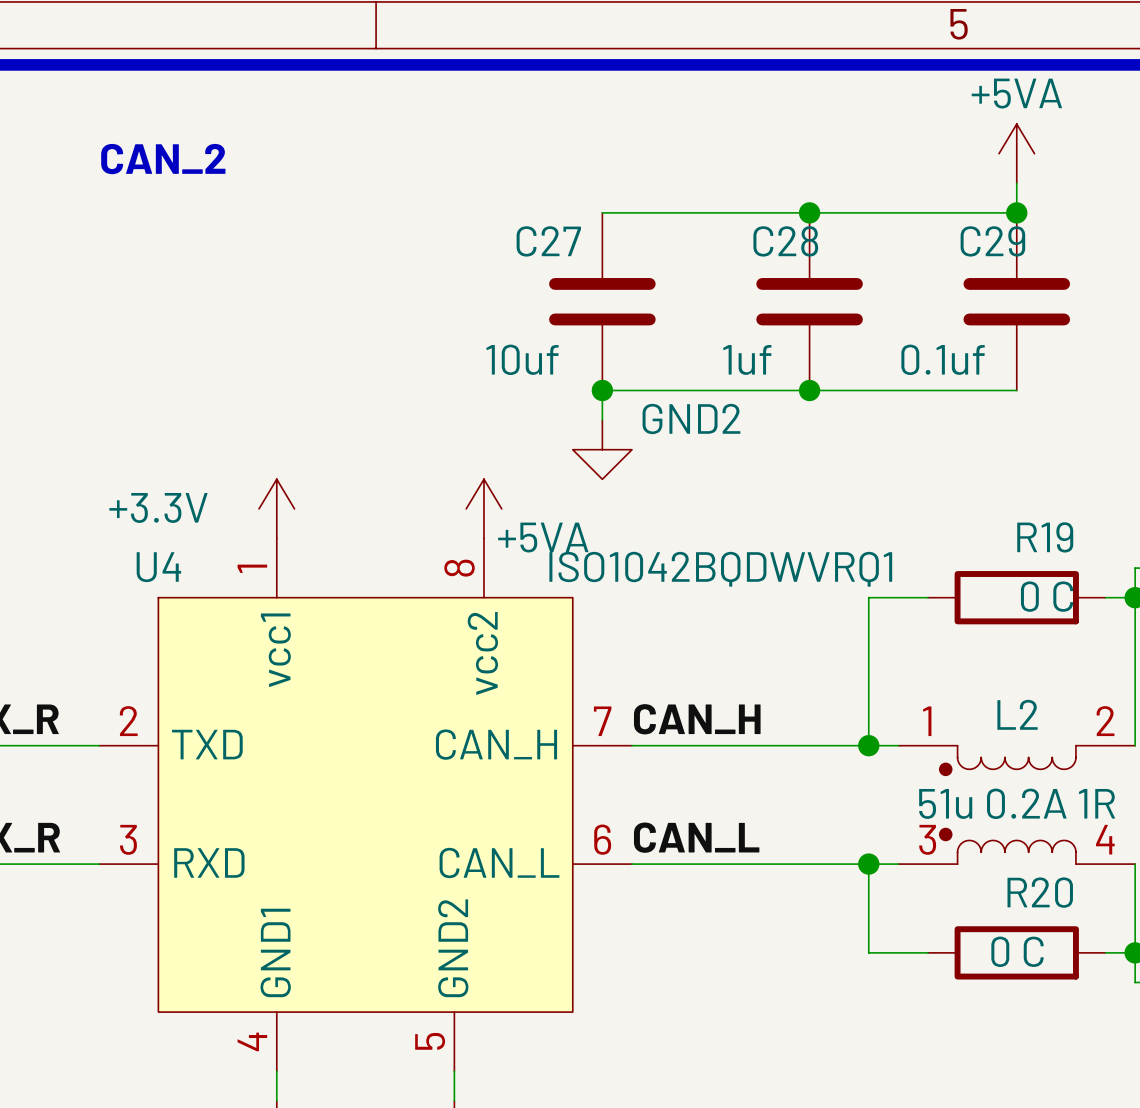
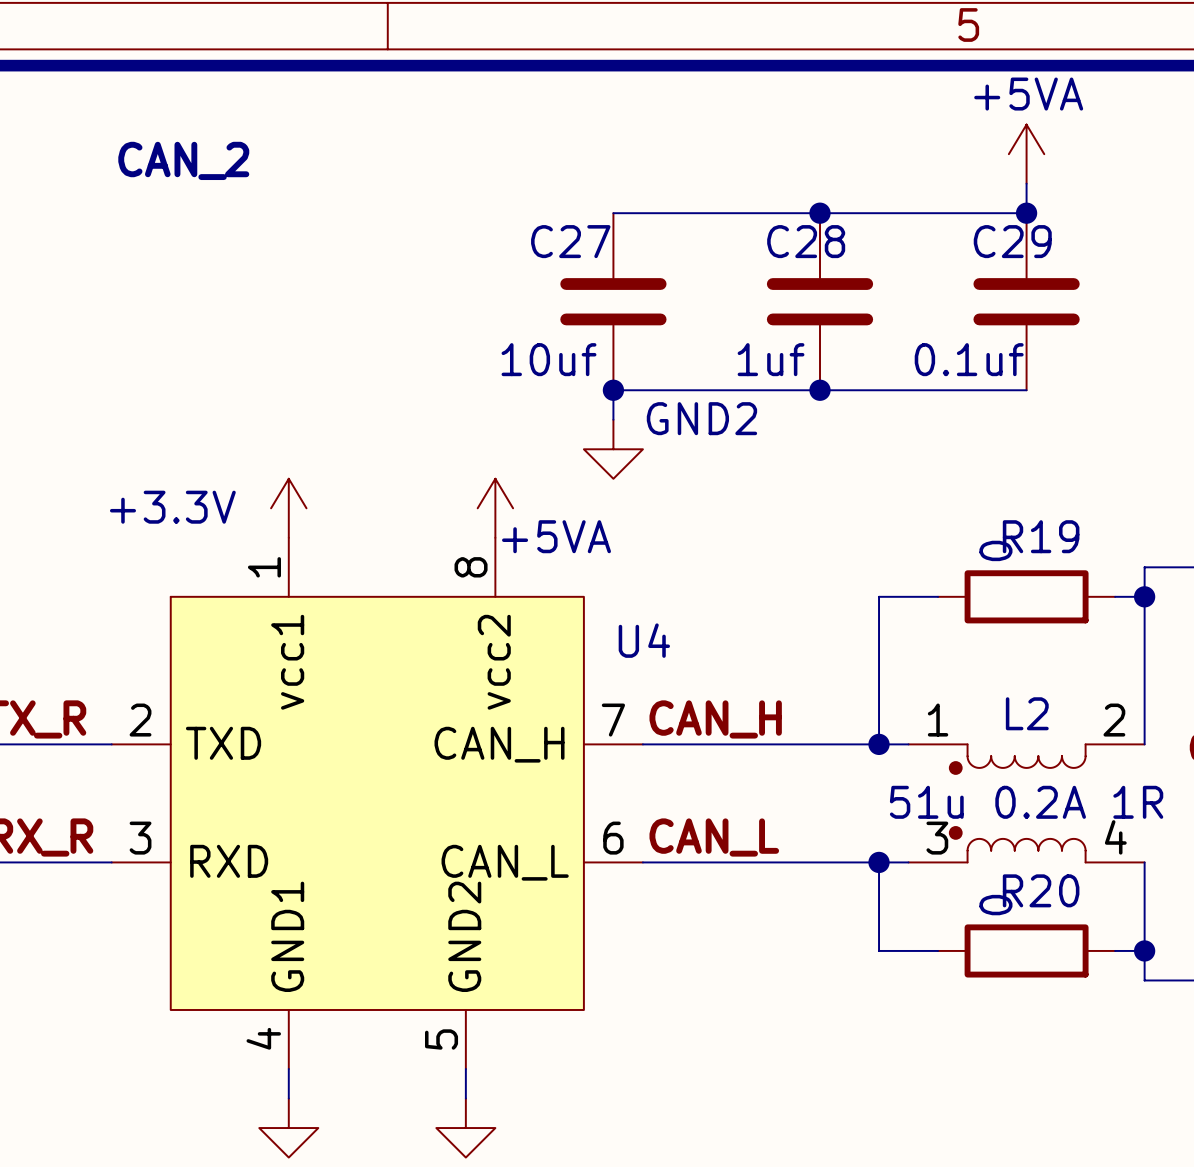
U4 name position: U4 (158, 567) -> U4 (644, 640)
U4 value: ISO1042BQDWVRQ1 (720, 569) -> none
R19 value: 0 C (1047, 596) -> 0 (995, 550)
R20 value: 0 C (1017, 951) -> 0 (995, 905)

